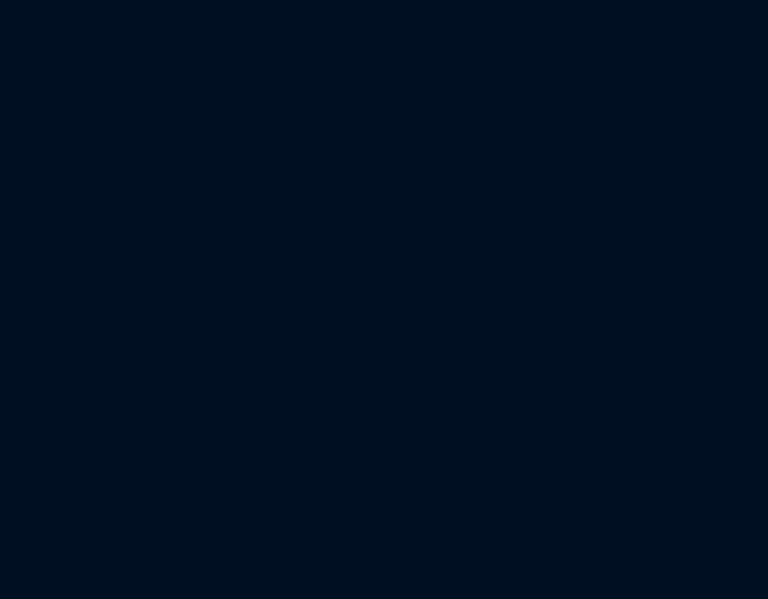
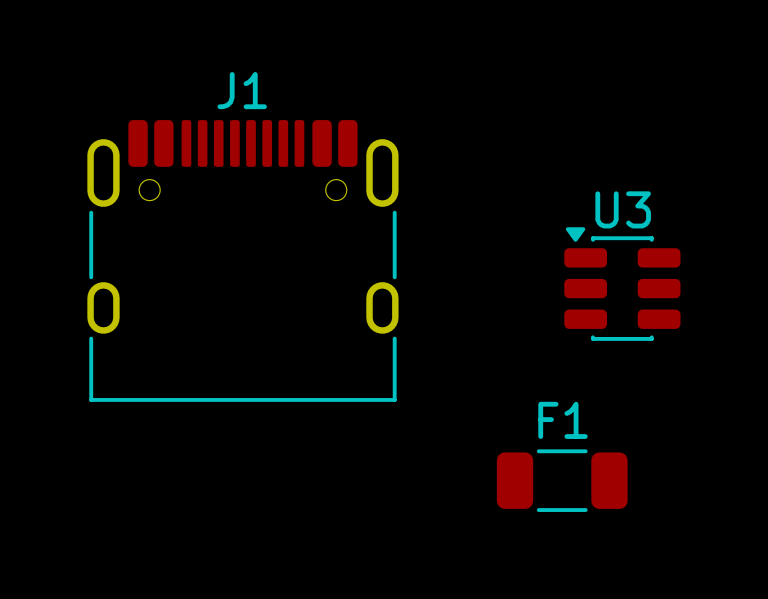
J1: none -> (242, 260)
U3: none -> (622, 284)
F1: none -> (562, 480)

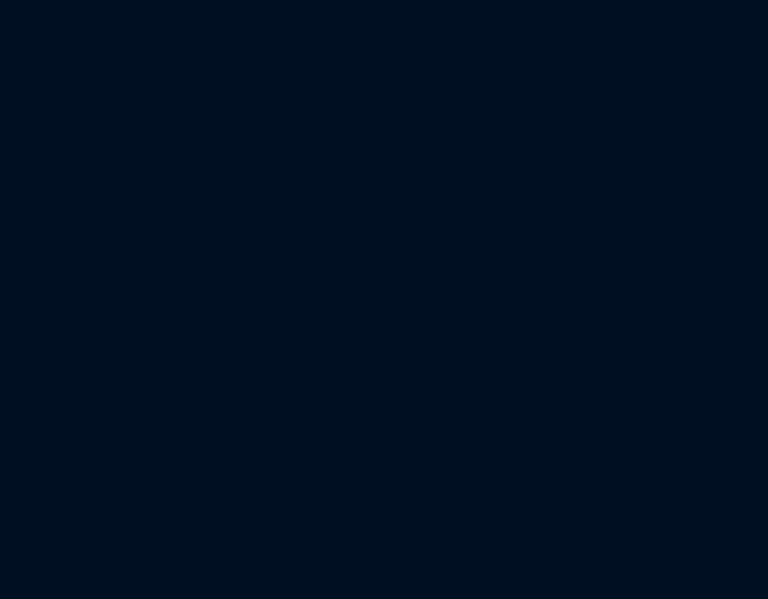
J1: (242, 260) -> none
U3: (622, 284) -> none
F1: (562, 480) -> none

